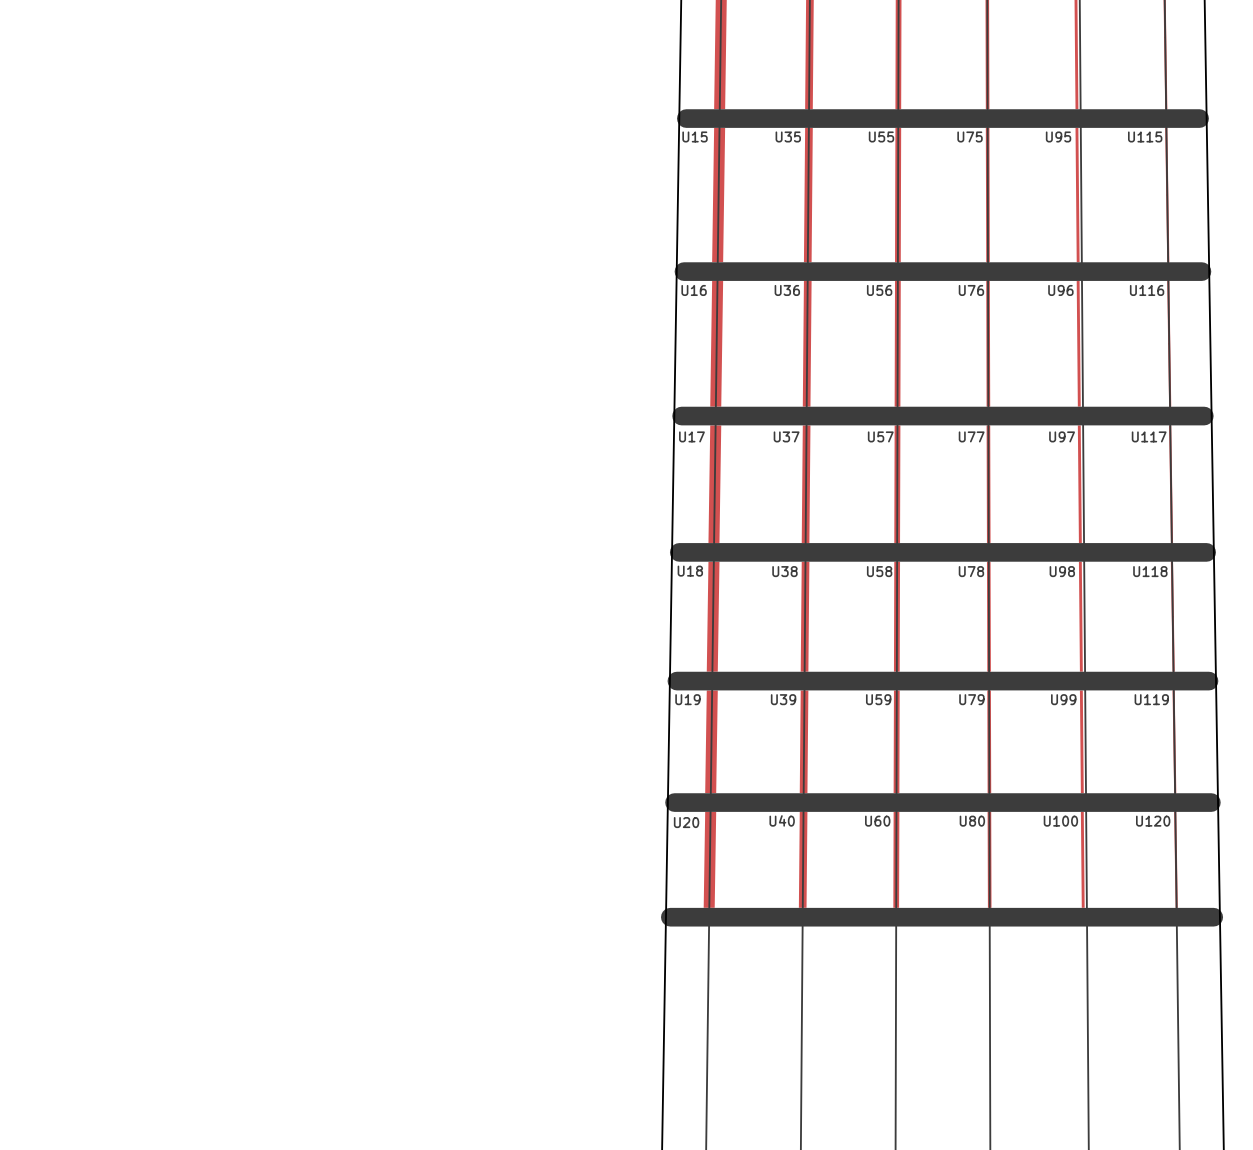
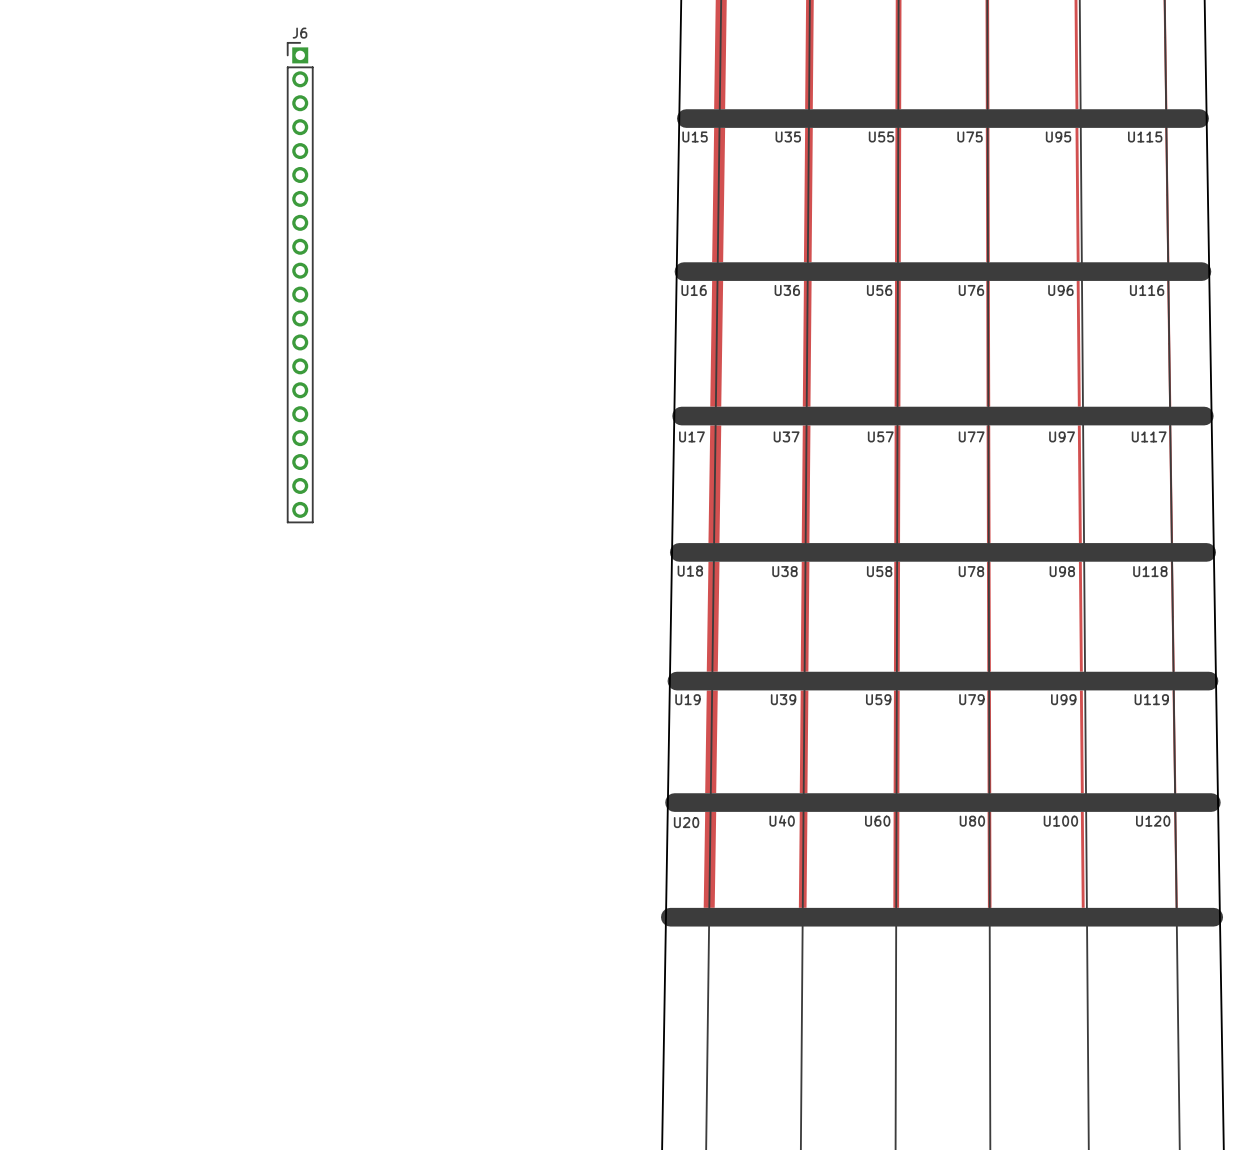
J6: none -> (300, 282)

